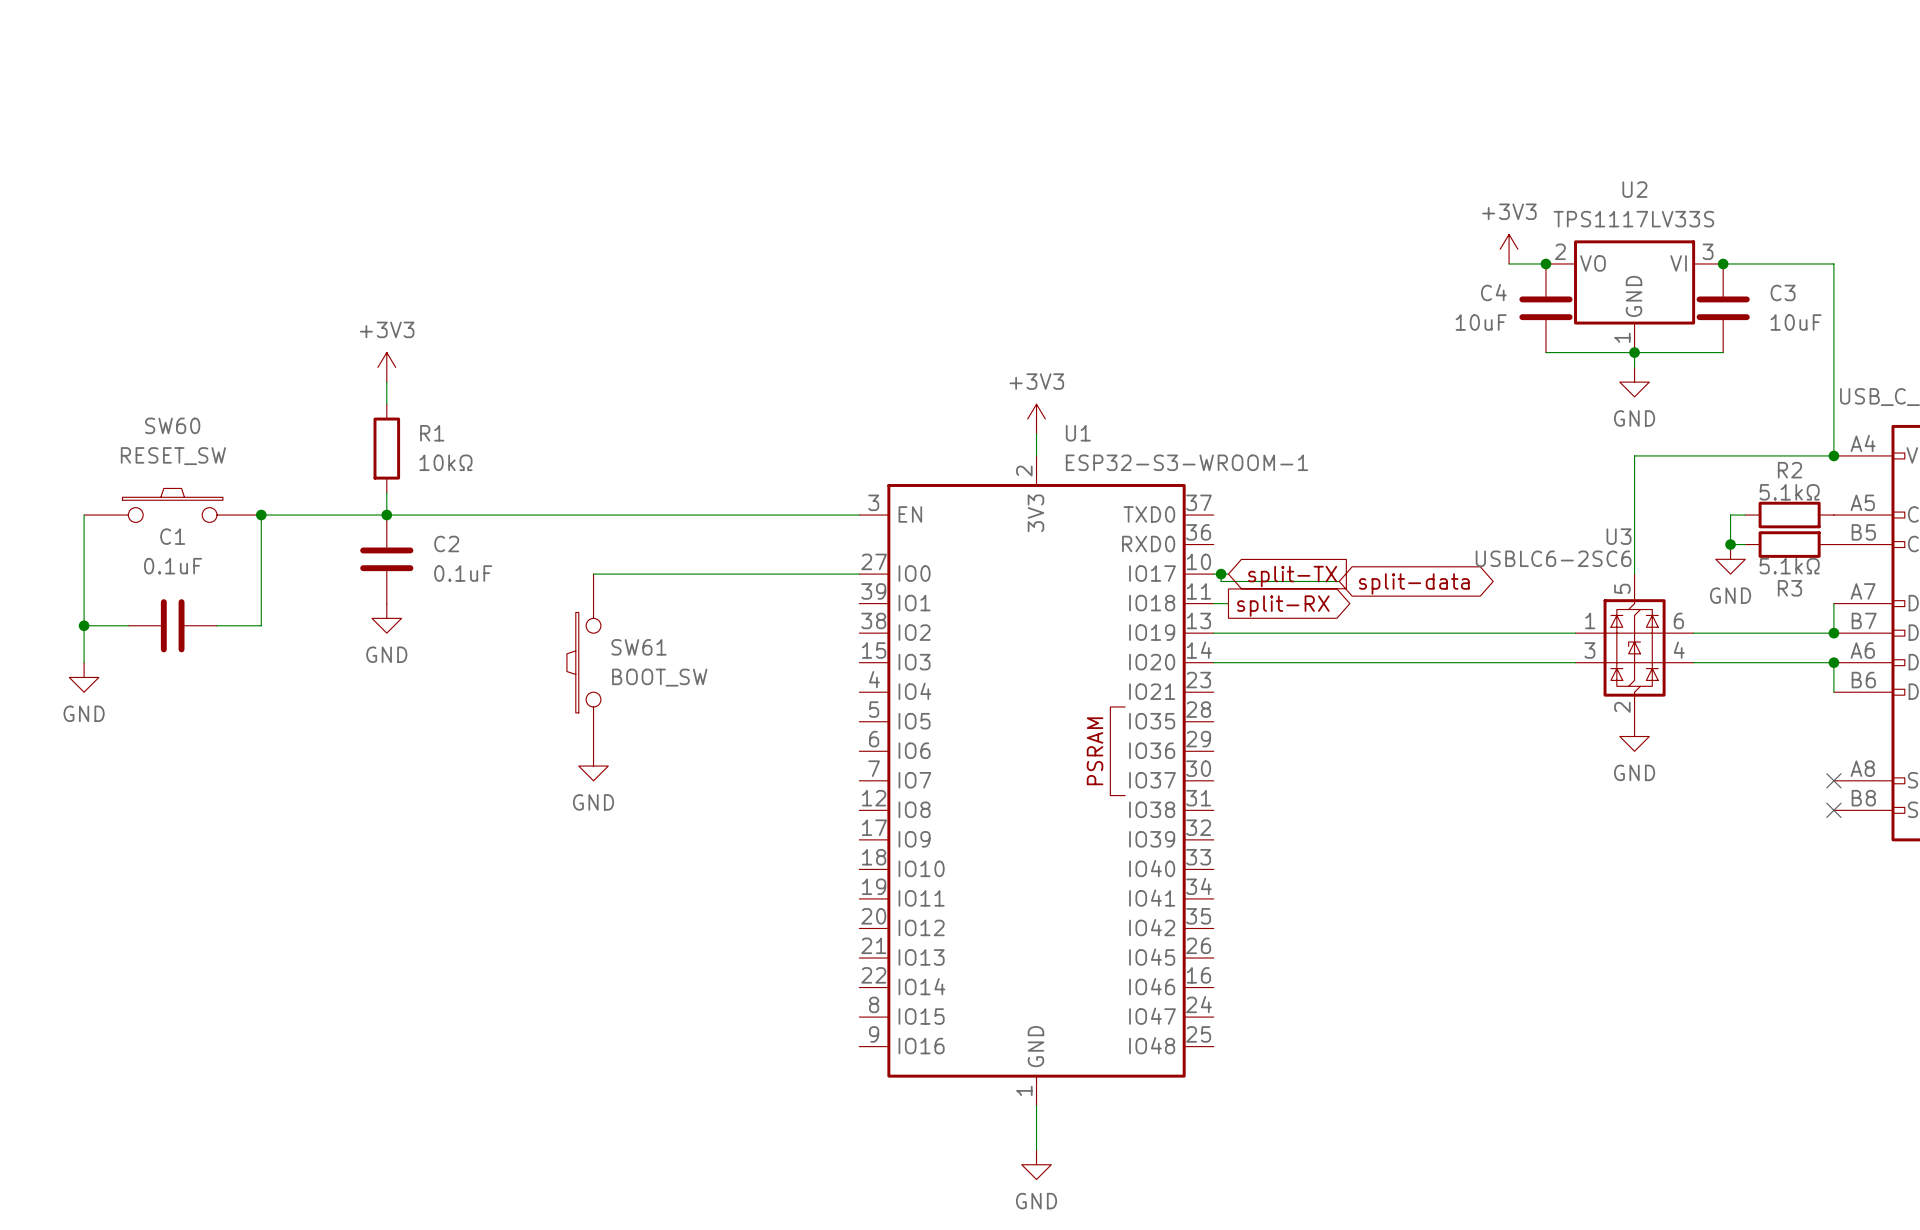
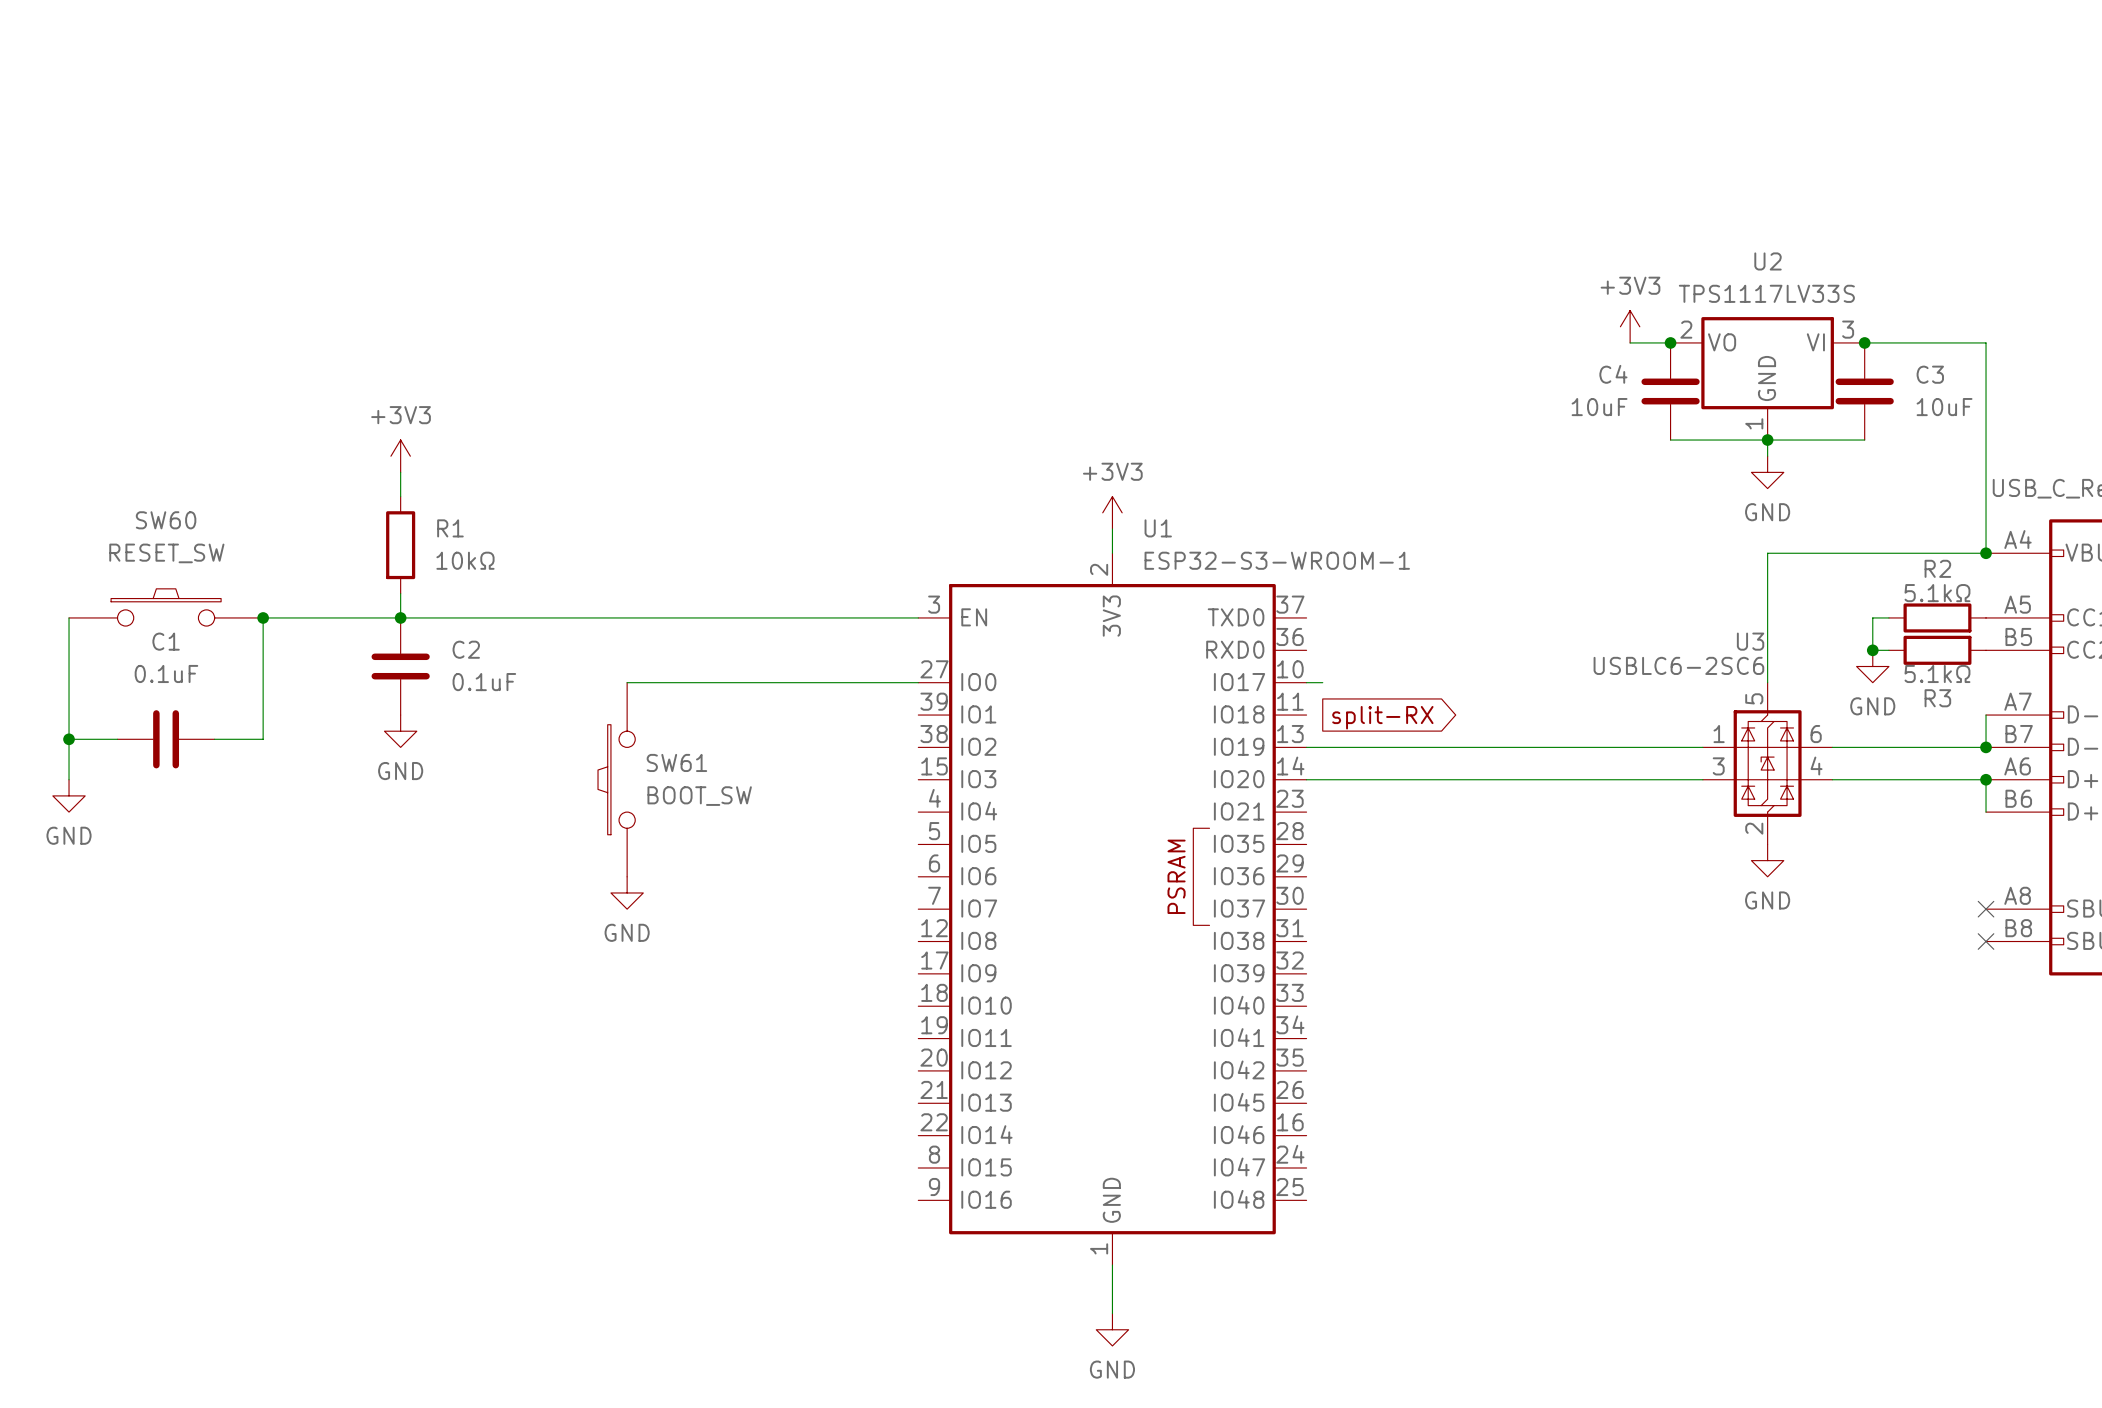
wire: (1221, 574) (1221, 581) (1339, 581) -> none
junction: (1221, 574) -> none
global label: split-TX (1292, 576) -> none
global label: split-data (1414, 583) -> none
wire: (1213, 603) (1228, 603) -> none

